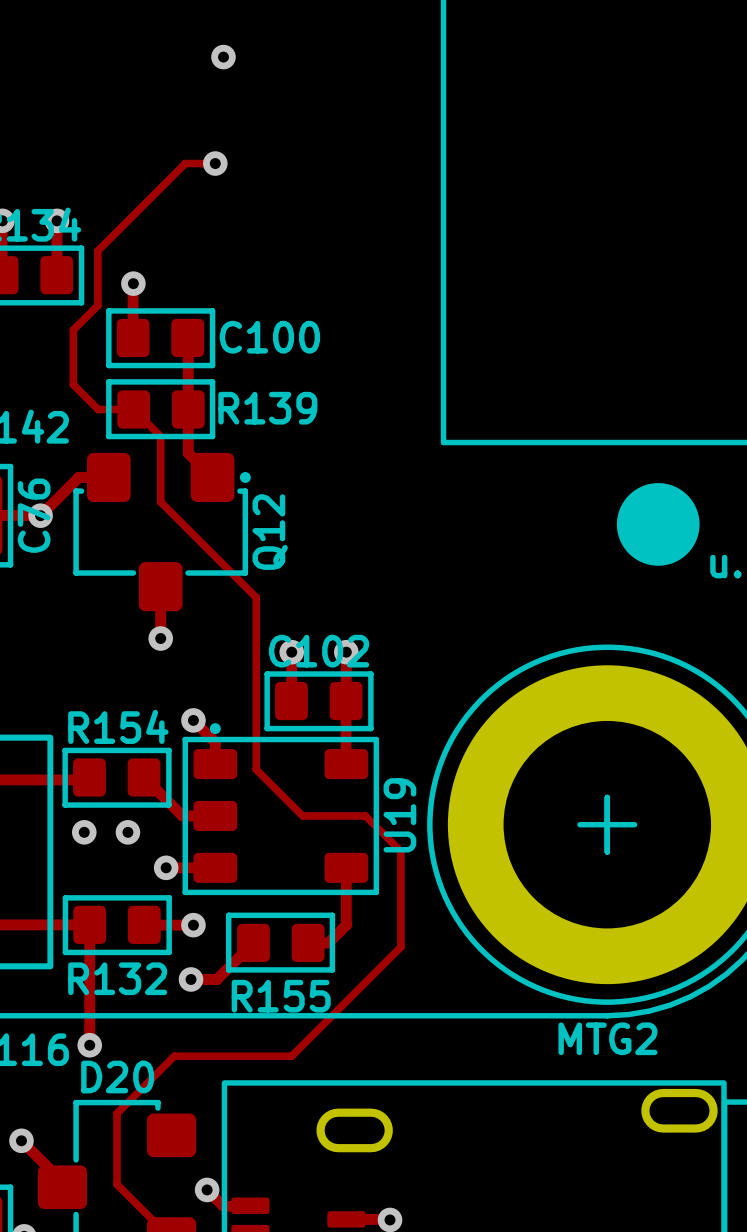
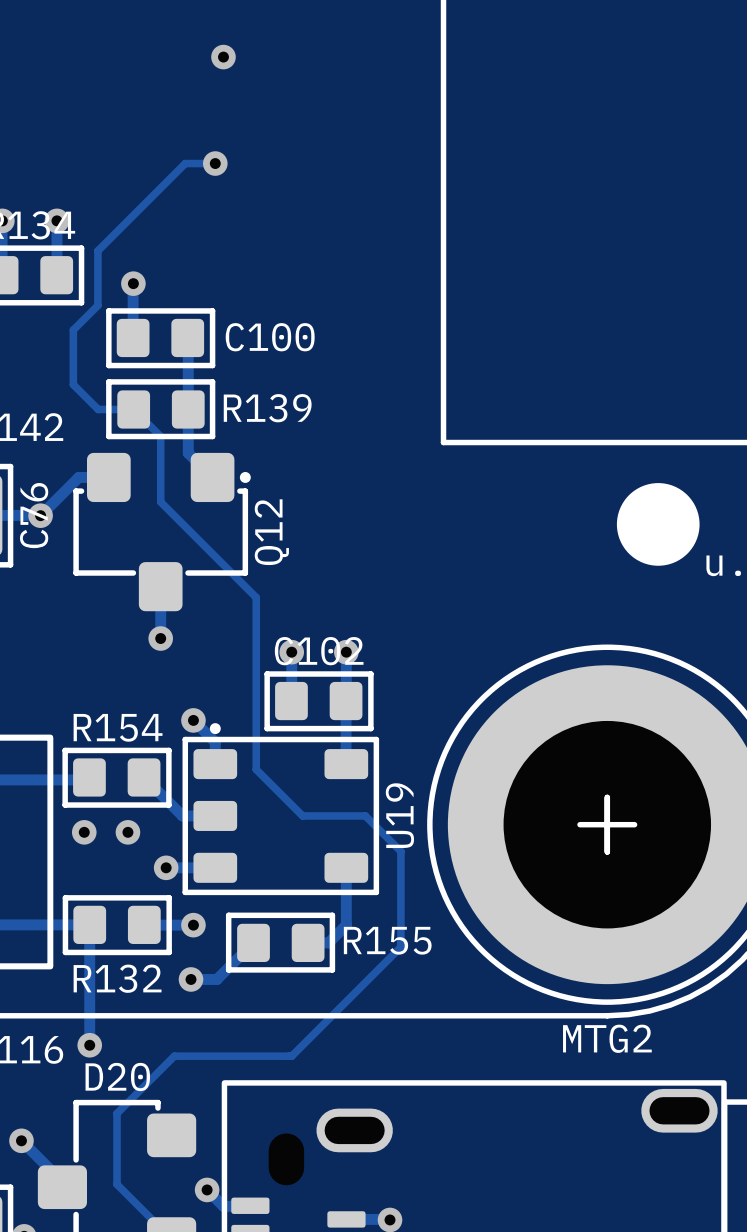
R155 name position: R155 (281, 996) -> R155 (387, 940)

